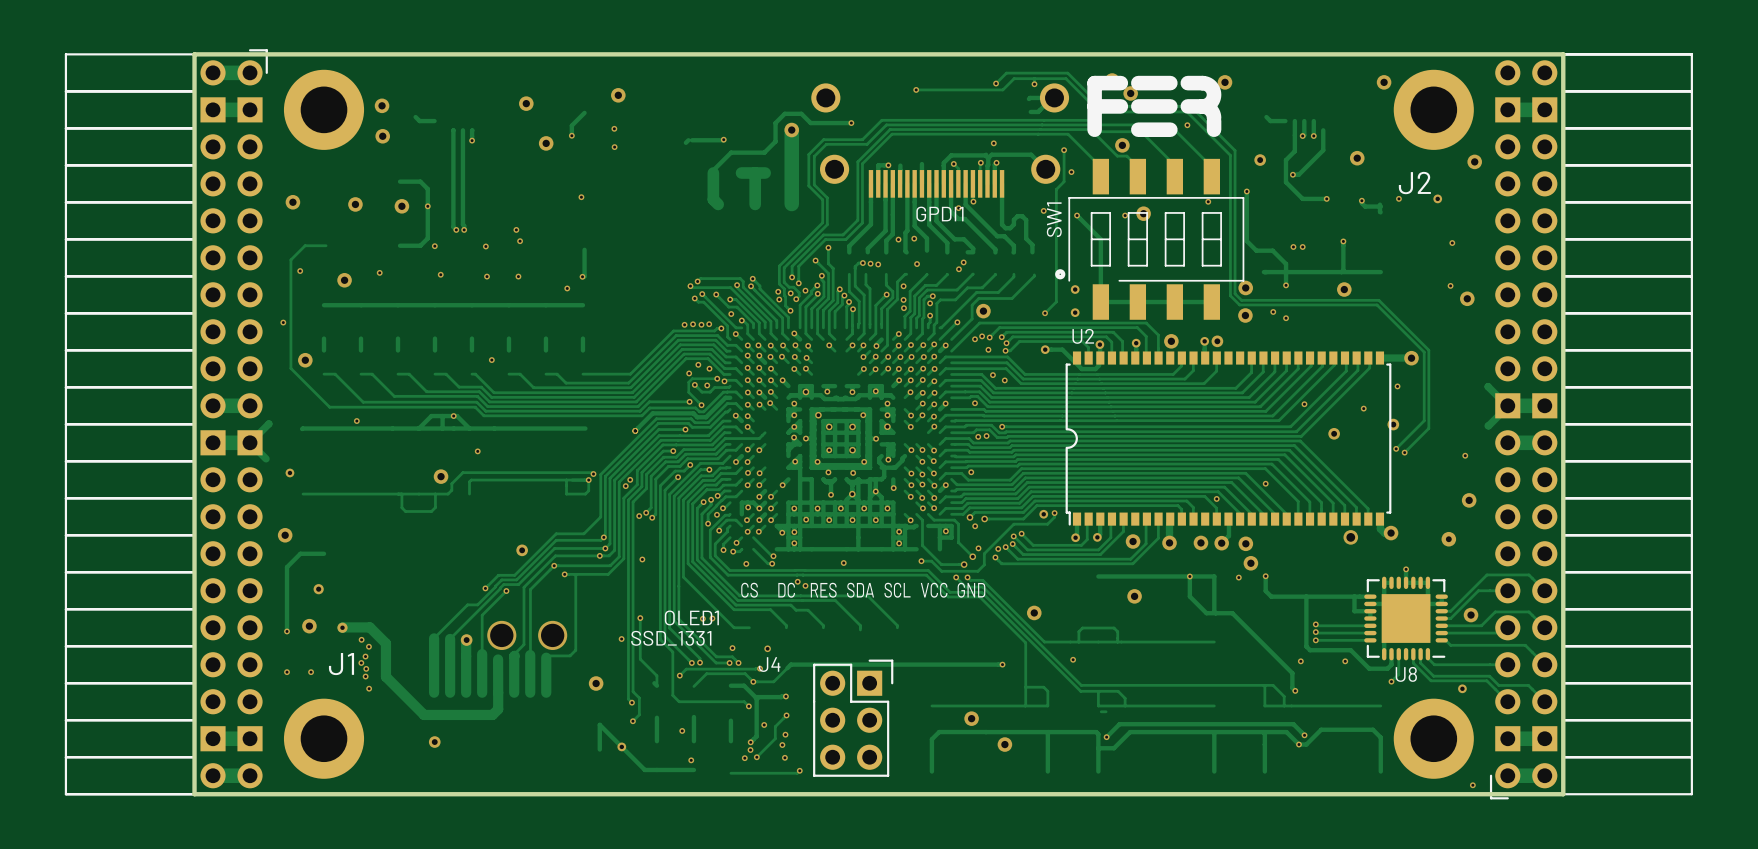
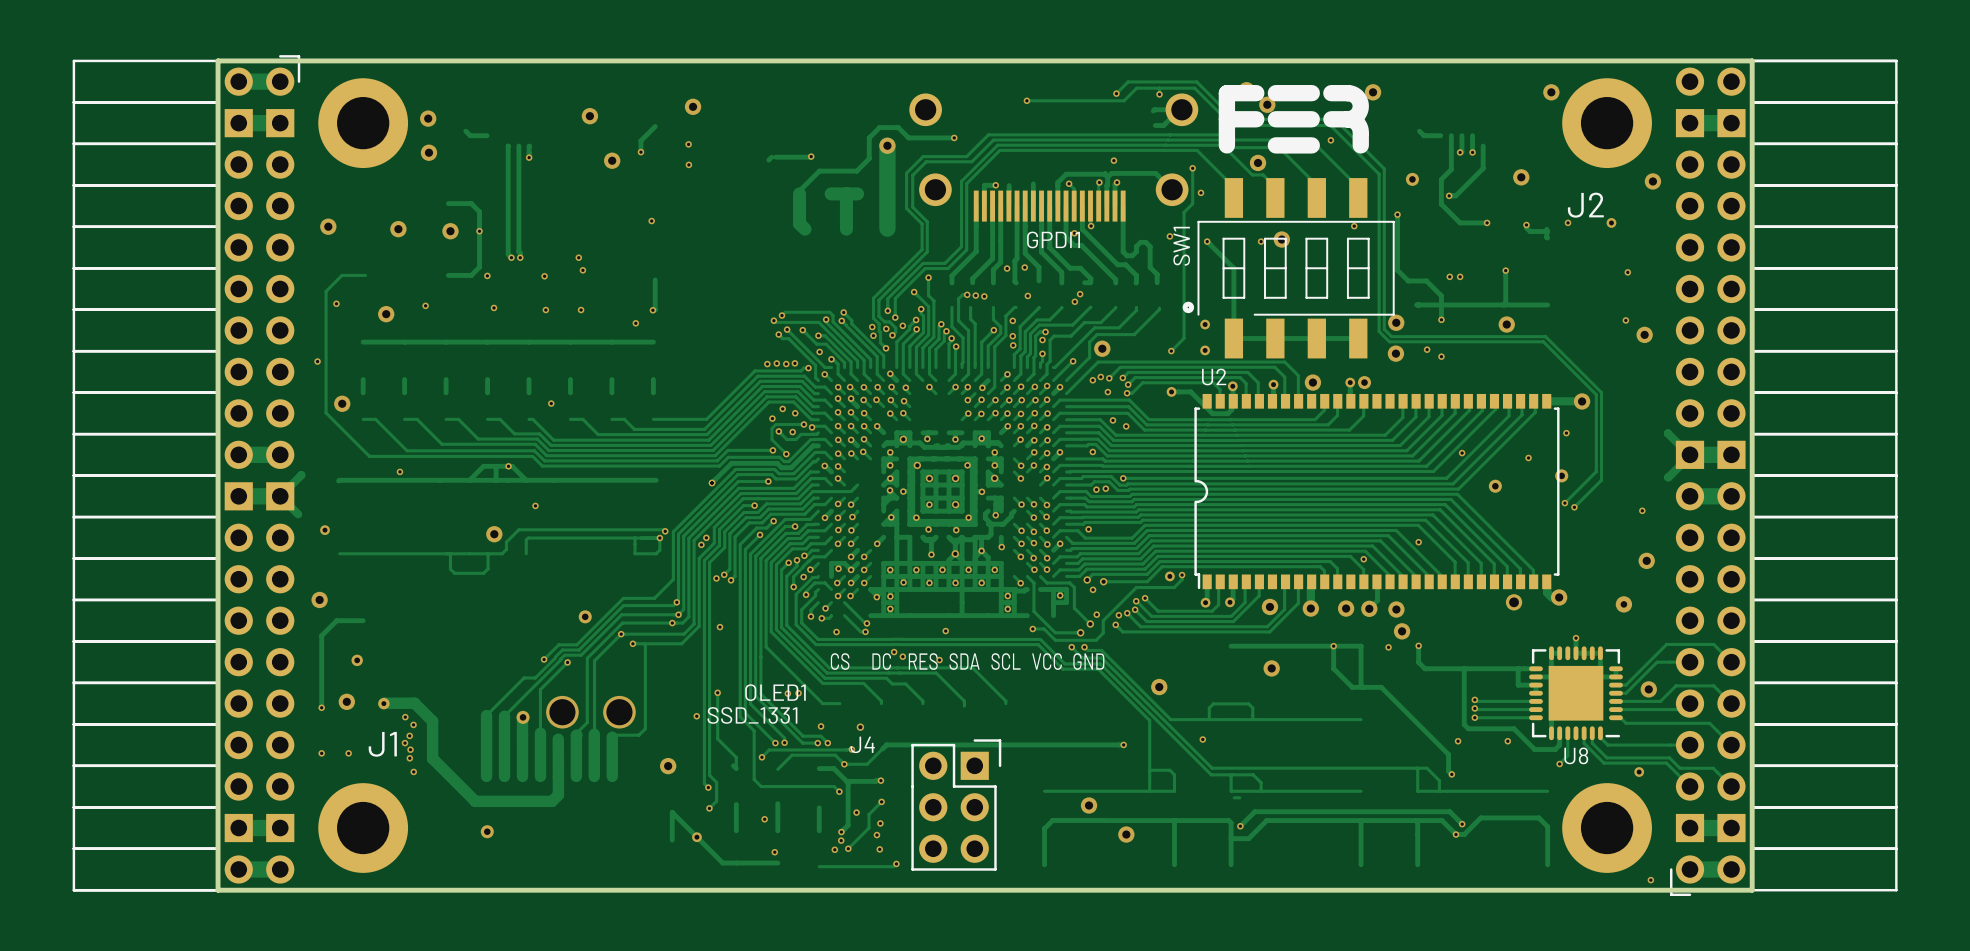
track: none -> (857, 511) (852, 517)
via: none -> (852, 517)
via: none -> (939, 660)

